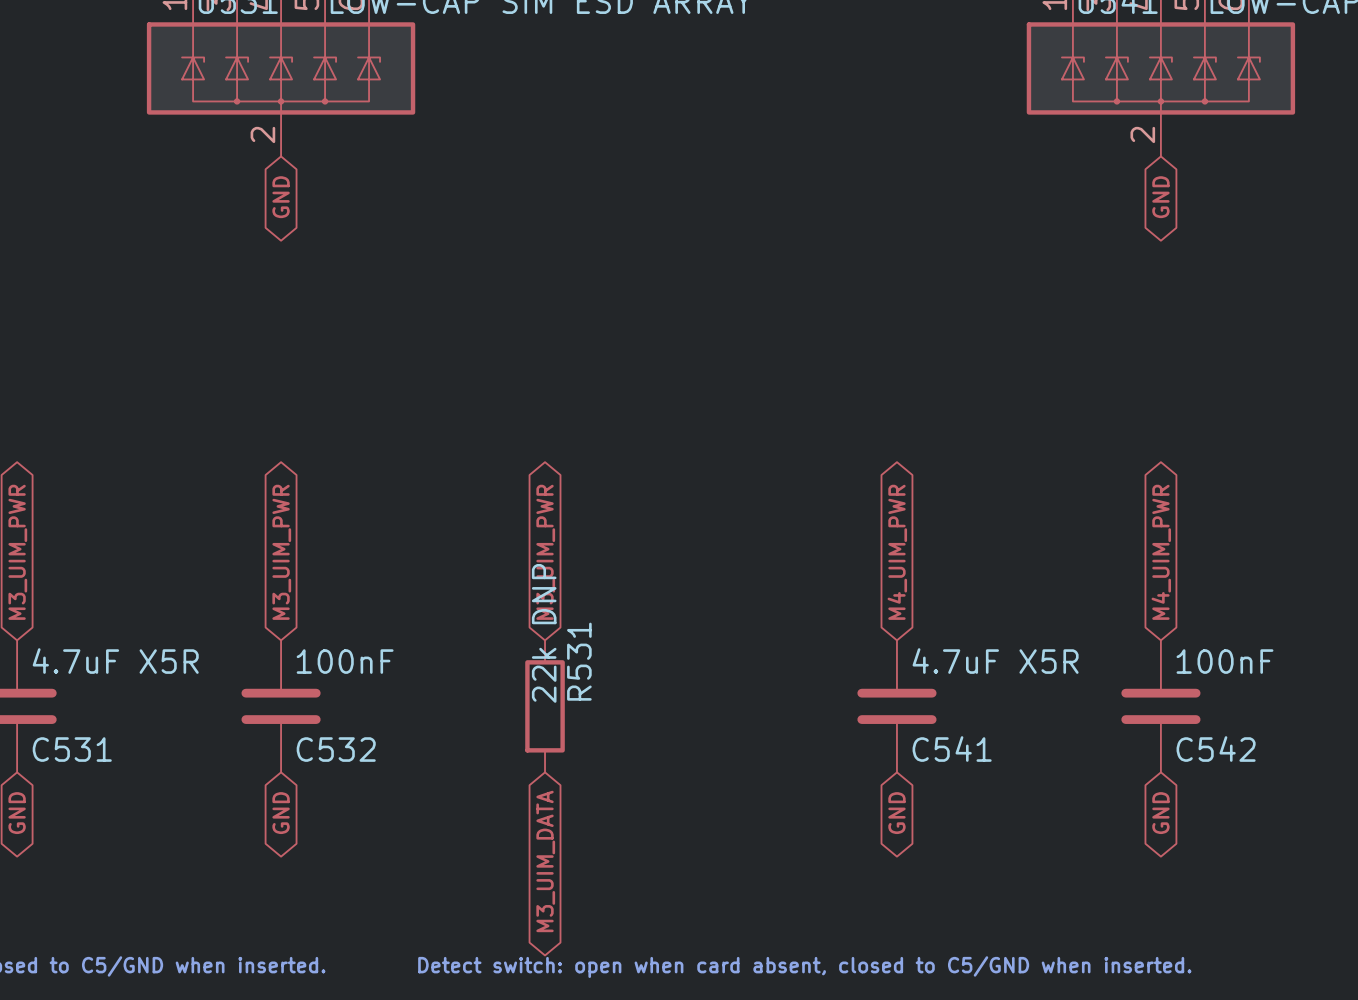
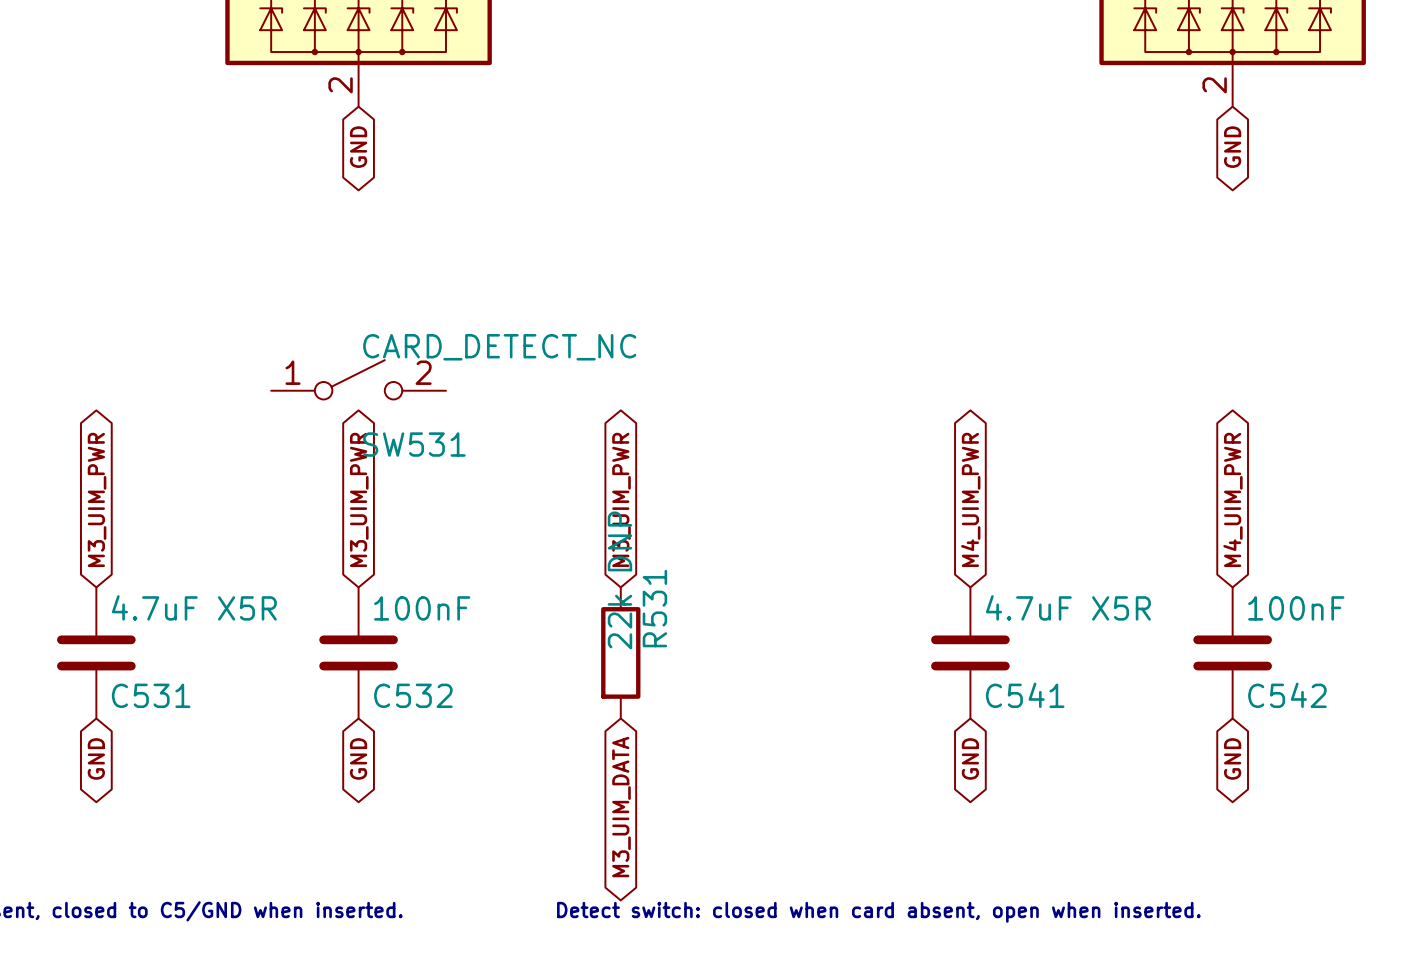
SW531: none -> CARD_DETECT_NC (358, 379)
text: Detect switch: open when card absent, closed to C5/GND when inserted. (804, 967) -> Detect switch: closed when card absent, open when inserted. (878, 912)

